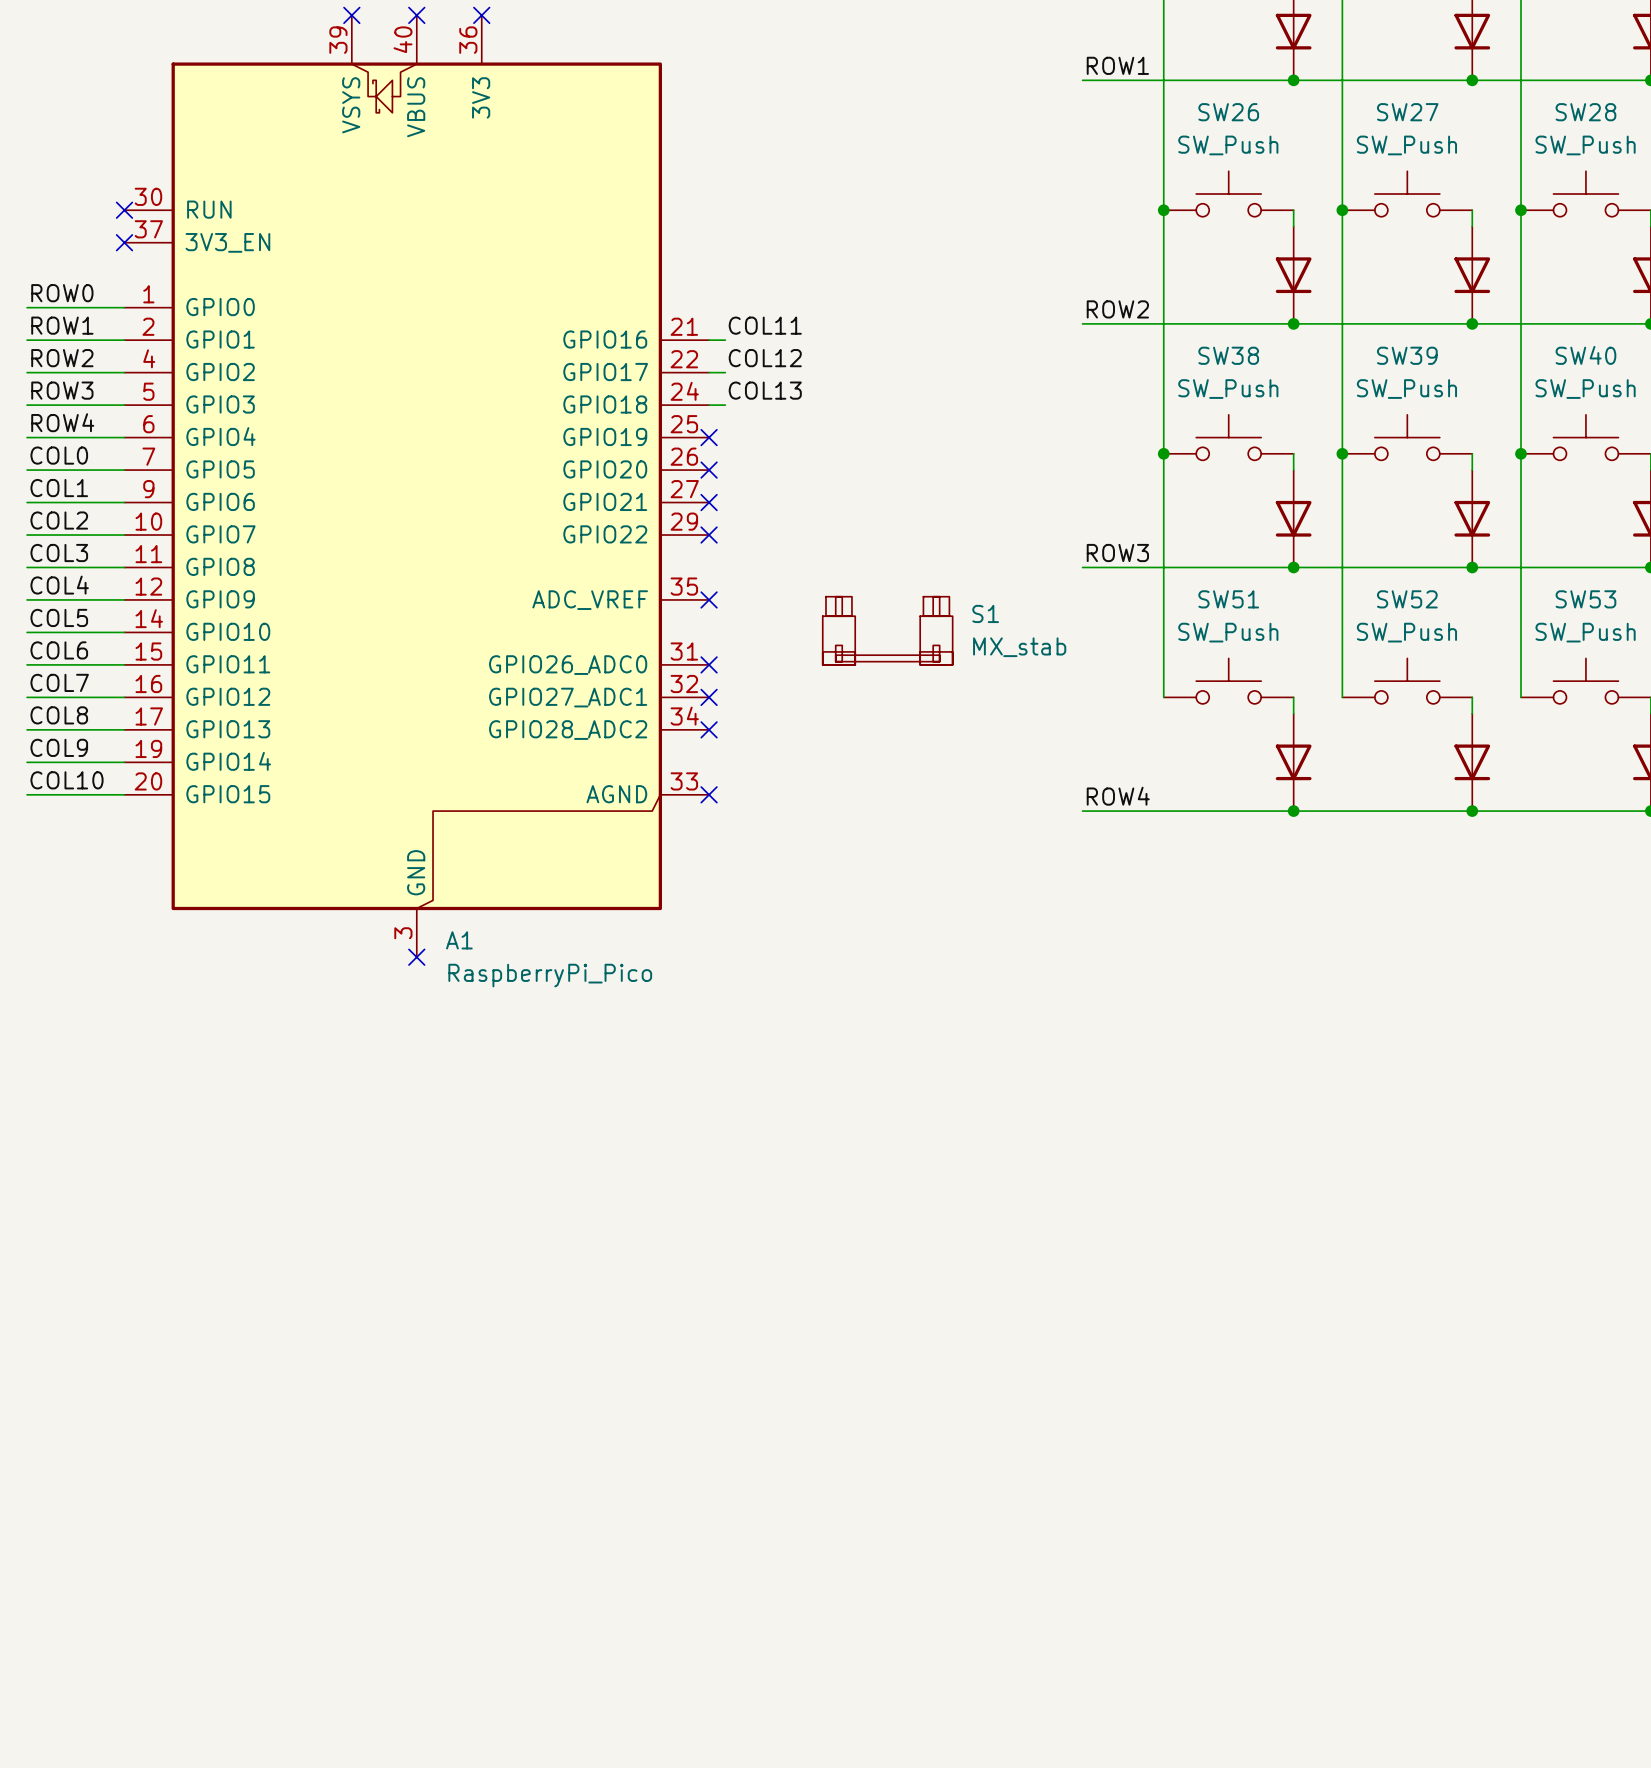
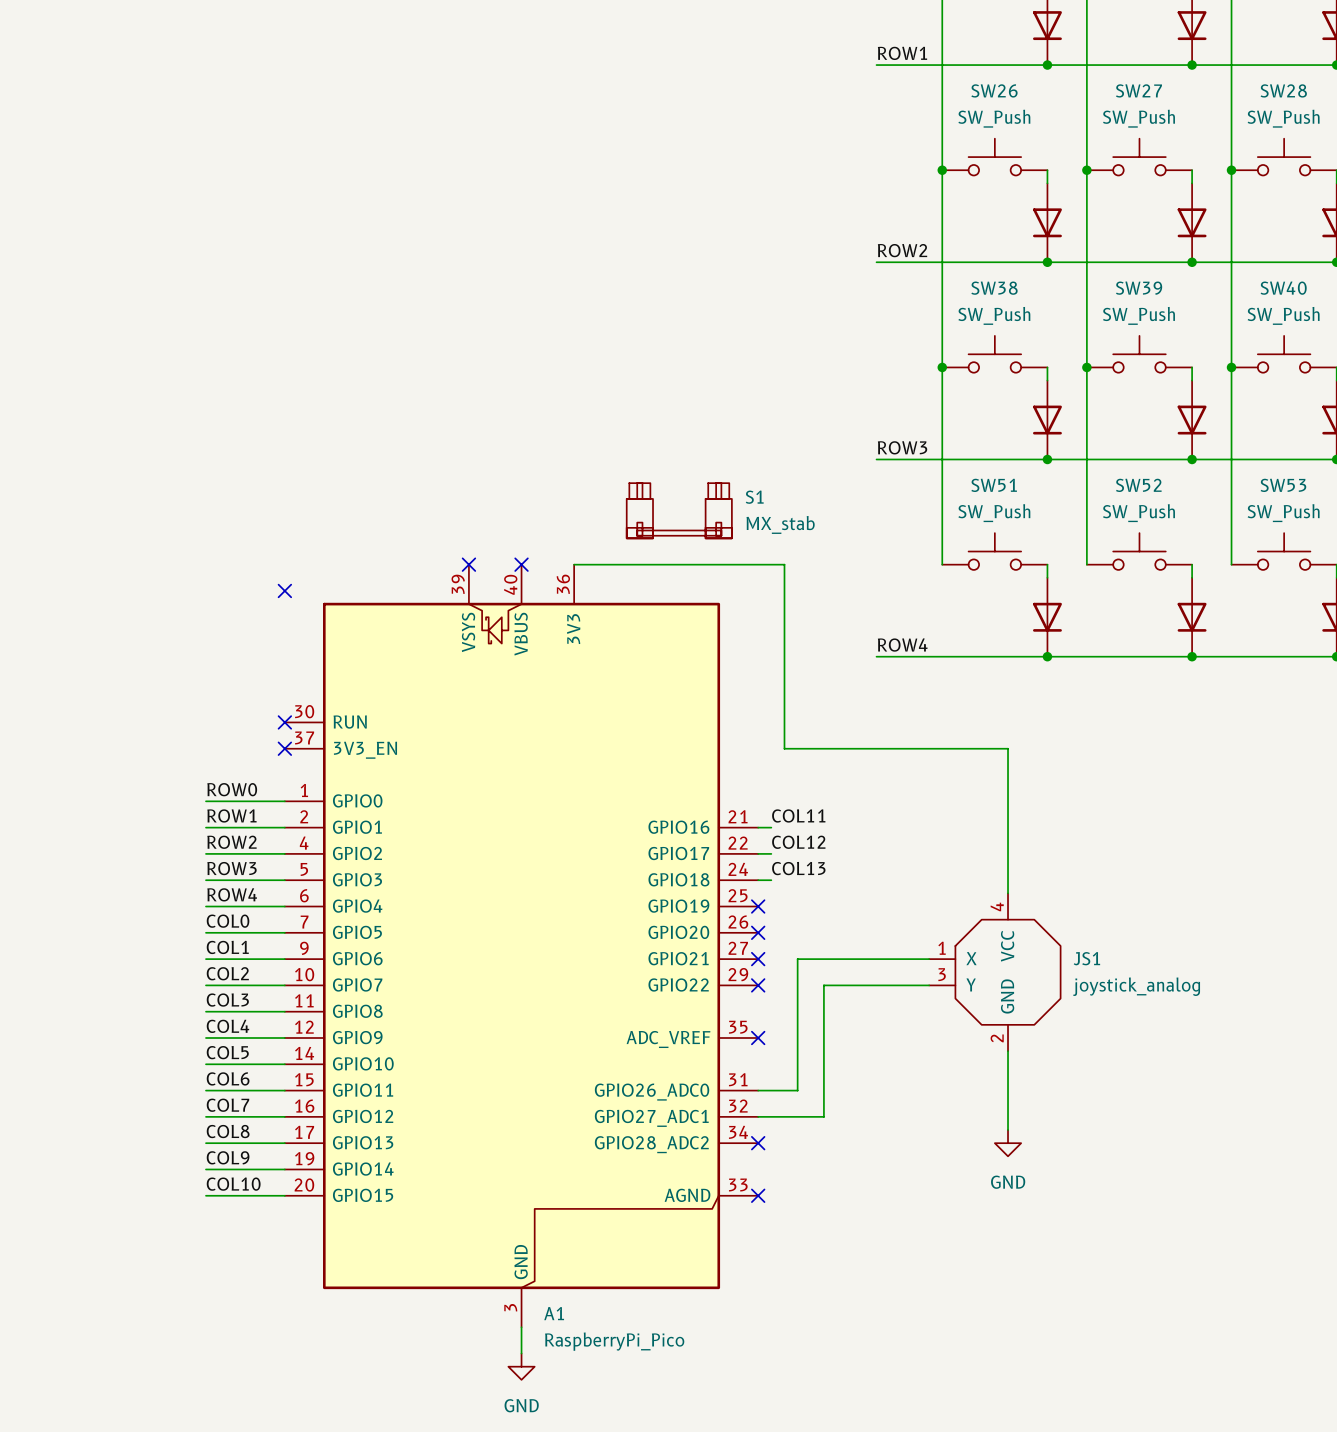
no-connect mark: (351, 15) -> none
no-connect mark: (416, 15) -> none
no-connect mark: (481, 15) -> none
no-connect mark: (124, 210) -> none
no-connect mark: (124, 242) -> none
label: ROW0 (62, 293) -> none
wire: (27, 307) (124, 307) -> none
label: ROW1 (62, 325) -> none
label: COL11 (765, 325) -> none
wire: (27, 340) (124, 340) -> none
wire: (709, 340) (725, 340) -> none
label: ROW2 (62, 358) -> none
label: COL12 (765, 358) -> none
wire: (27, 372) (124, 372) -> none
wire: (709, 372) (725, 372) -> none
label: ROW3 (62, 390) -> none
label: COL13 (765, 390) -> none
wire: (27, 405) (124, 405) -> none
wire: (709, 405) (725, 405) -> none
label: ROW4 (62, 422) -> none
wire: (27, 437) (124, 437) -> none
no-connect mark: (709, 437) -> none
label: COL0 (59, 455) -> none
wire: (27, 470) (124, 470) -> none
no-connect mark: (709, 470) -> none
A1 position: (416, 486) -> (521, 945)
label: COL1 (59, 488) -> none
wire: (27, 502) (124, 502) -> none
no-connect mark: (709, 502) -> none
label: COL2 (59, 520) -> none
wire: (27, 535) (124, 535) -> none
no-connect mark: (709, 535) -> none
label: COL3 (59, 552) -> none
wire: (27, 567) (124, 567) -> none
label: COL4 (59, 585) -> none
wire: (27, 599) (124, 599) -> none
no-connect mark: (709, 599) -> none
label: COL5 (59, 617) -> none
S1 position: (887, 630) -> (679, 510)
wire: (27, 632) (124, 632) -> none
label: COL6 (59, 650) -> none
wire: (27, 664) (124, 664) -> none
no-connect mark: (709, 664) -> none
label: COL7 (59, 682) -> none
wire: (27, 697) (124, 697) -> none
no-connect mark: none -> (468, 564)
no-connect mark: none -> (521, 564)
wire: none -> (574, 564) (784, 564) (784, 748) (1008, 748) (1008, 893)
no-connect mark: (709, 697) -> none
label: COL8 (59, 715) -> none
wire: (27, 729) (124, 729) -> none
no-connect mark: none -> (284, 590)
no-connect mark: (709, 729) -> none
label: COL9 (59, 747) -> none
wire: (27, 762) (124, 762) -> none
label: COL10 (67, 780) -> none
wire: (27, 794) (124, 794) -> (205, 801) (284, 801)
no-connect mark: (709, 794) -> none
no-connect mark: none -> (284, 722)
no-connect mark: none -> (284, 748)
no-connect mark: (416, 957) -> none
label: none -> ROW0 (232, 789)
label: none -> ROW1 (231, 815)
label: none -> COL11 (798, 815)
wire: none -> (205, 827) (284, 827)
wire: none -> (758, 827) (771, 827)
label: none -> ROW2 (231, 842)
label: none -> COL12 (798, 842)
wire: none -> (205, 853) (284, 853)
wire: none -> (758, 853) (771, 853)
label: none -> ROW3 (231, 868)
label: none -> COL13 (798, 868)
wire: none -> (205, 880) (284, 880)
wire: none -> (758, 880) (771, 880)
label: none -> ROW4 (232, 894)
wire: none -> (205, 906) (284, 906)
no-connect mark: none -> (758, 906)
label: none -> COL0 (228, 921)
wire: none -> (205, 932) (284, 932)
no-connect mark: none -> (758, 932)
label: none -> COL1 (227, 947)
wire: none -> (205, 959) (284, 959)
no-connect mark: none -> (758, 959)
wire: none -> (929, 959) (797, 959) (797, 1090) (758, 1090)
JS1: none -> joystick_analog (994, 972)
label: none -> COL2 (227, 973)
wire: none -> (205, 985) (284, 985)
no-connect mark: none -> (758, 985)
wire: none -> (929, 985) (823, 985) (823, 1116) (758, 1116)
label: none -> COL3 (227, 1000)
wire: none -> (205, 1011) (284, 1011)
label: none -> COL4 (227, 1026)
wire: none -> (205, 1037) (284, 1037)
no-connect mark: none -> (758, 1037)
wire: none -> (1008, 1051) (1008, 1130)
label: none -> COL5 (227, 1052)
wire: none -> (205, 1064) (284, 1064)
label: none -> COL6 (228, 1078)
wire: none -> (205, 1090) (284, 1090)
label: none -> COL7 (227, 1105)
wire: none -> (205, 1116) (284, 1116)
label: none -> COL8 (228, 1131)
wire: none -> (205, 1143) (284, 1143)
no-connect mark: none -> (758, 1143)
power symbol: none -> GND (1008, 1143)
label: none -> COL9 (228, 1157)
wire: none -> (205, 1169) (284, 1169)
label: none -> COL10 (233, 1184)
wire: none -> (205, 1195) (284, 1195)
no-connect mark: none -> (758, 1195)
wire: none -> (521, 1327) (521, 1353)
power symbol: none -> GND (521, 1366)

